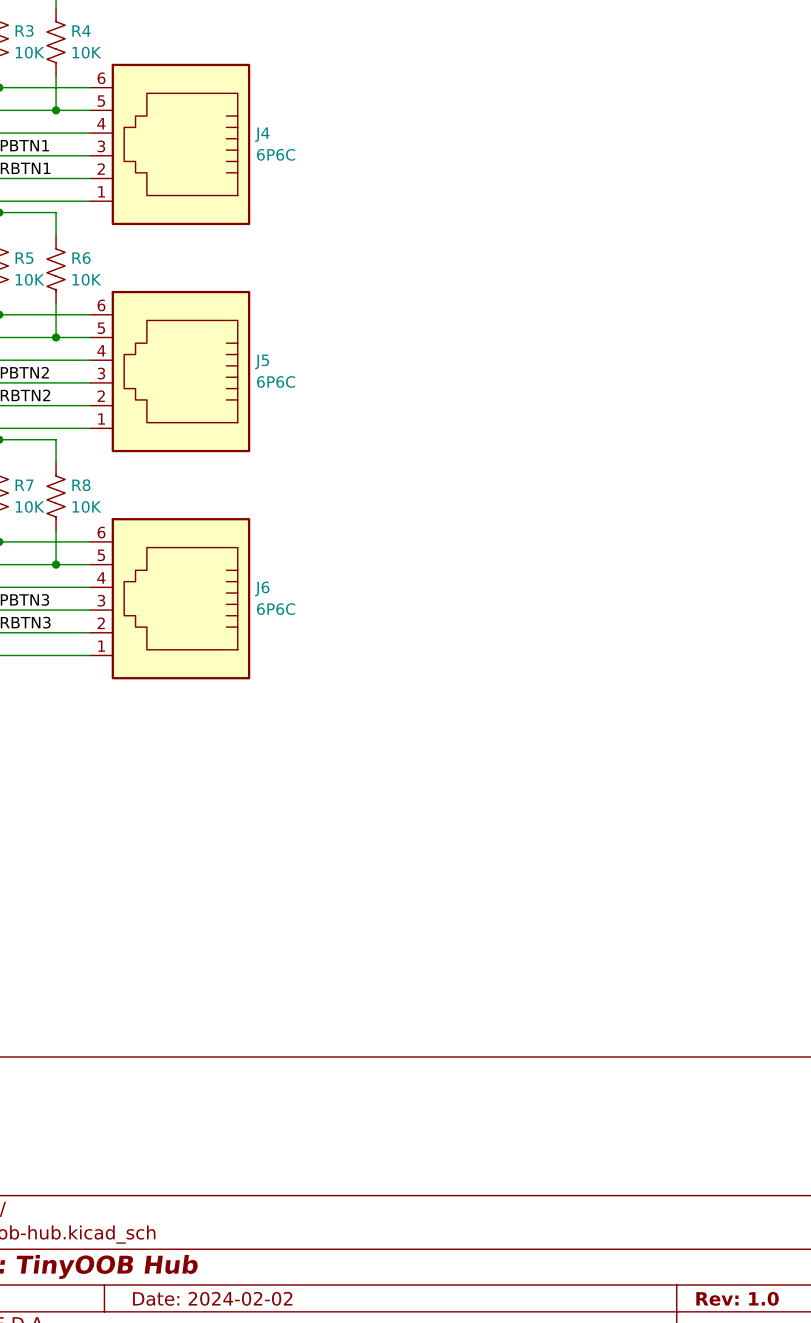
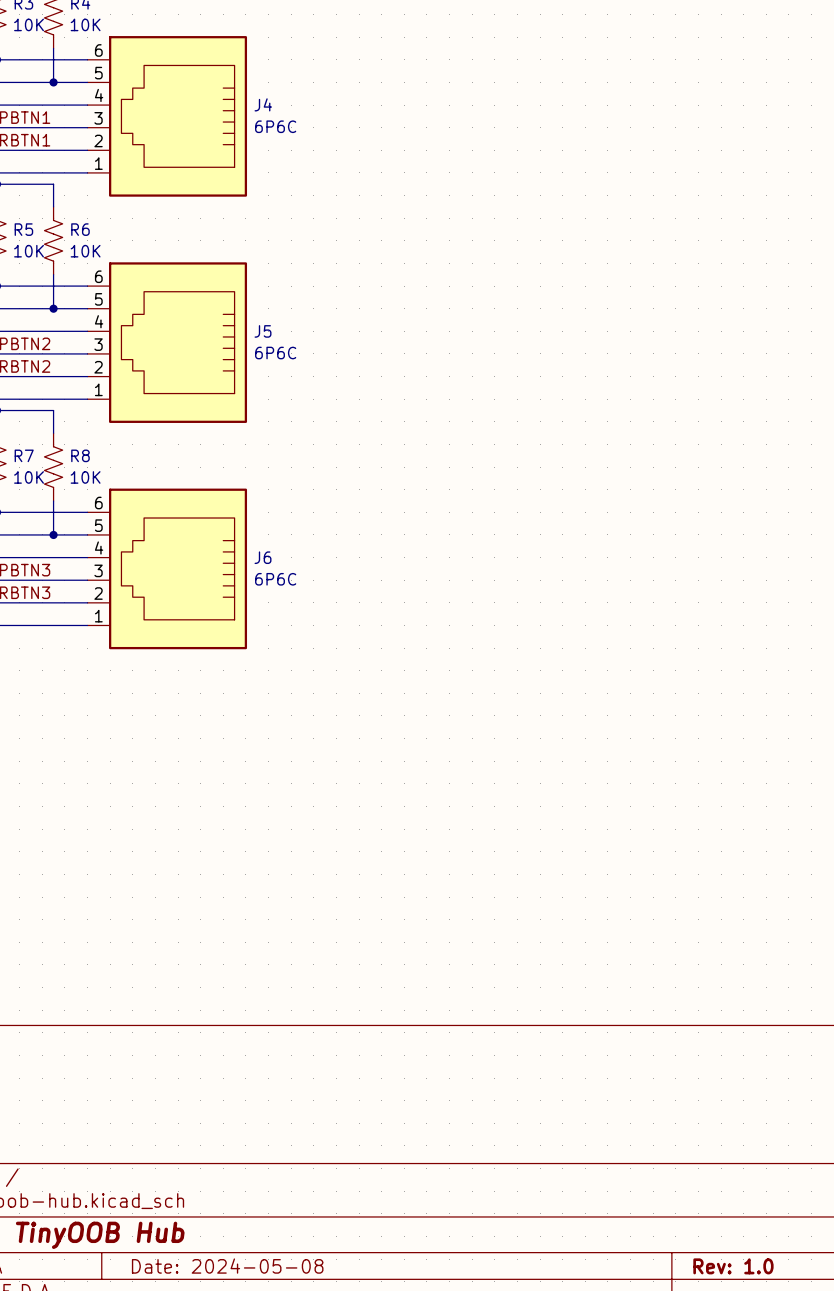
title block: Date: 2024-02-02 (212, 1298) -> Date: 2024-05-08 (227, 1266)

